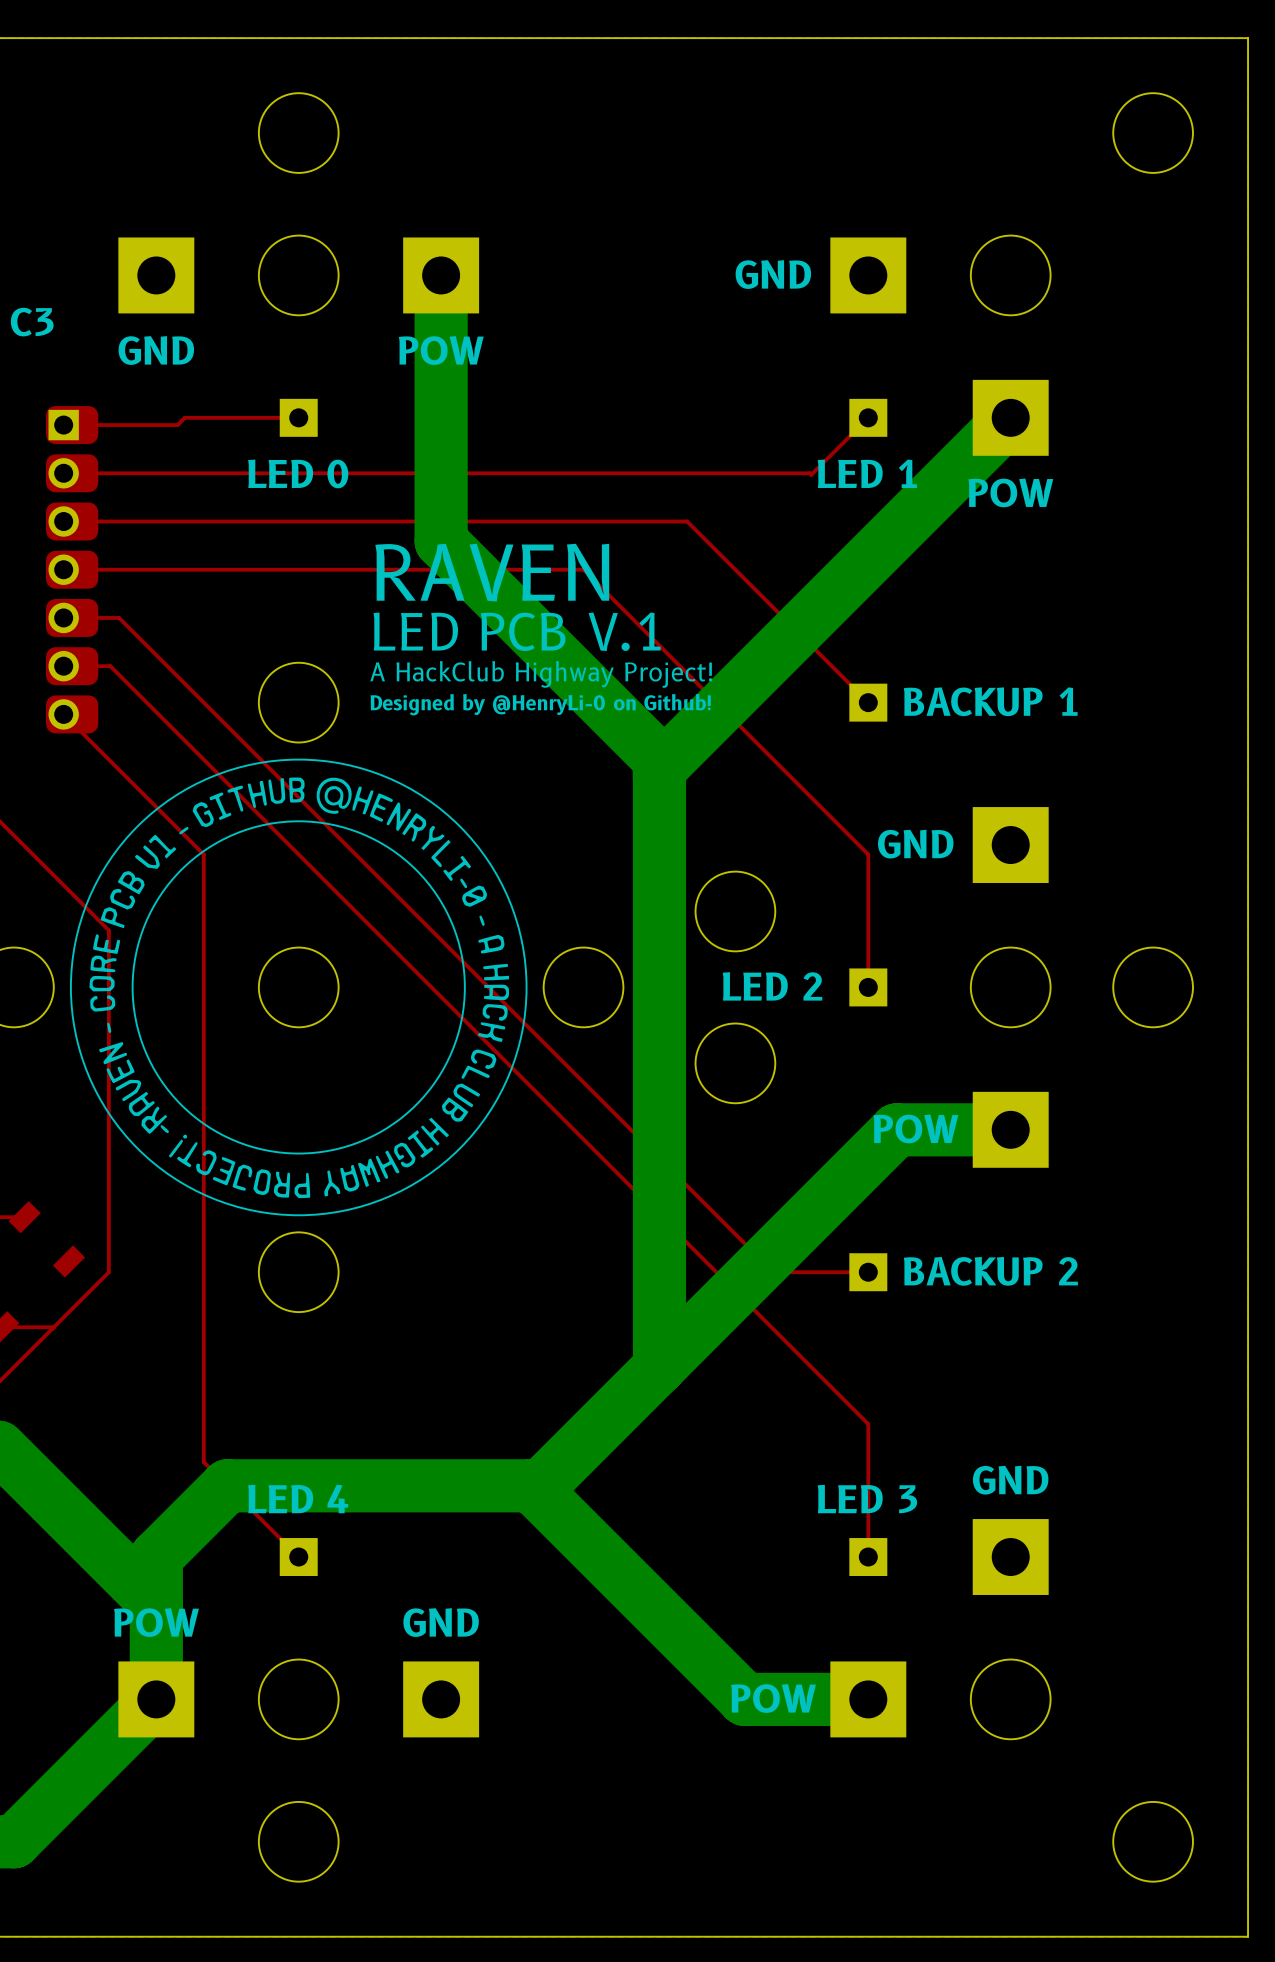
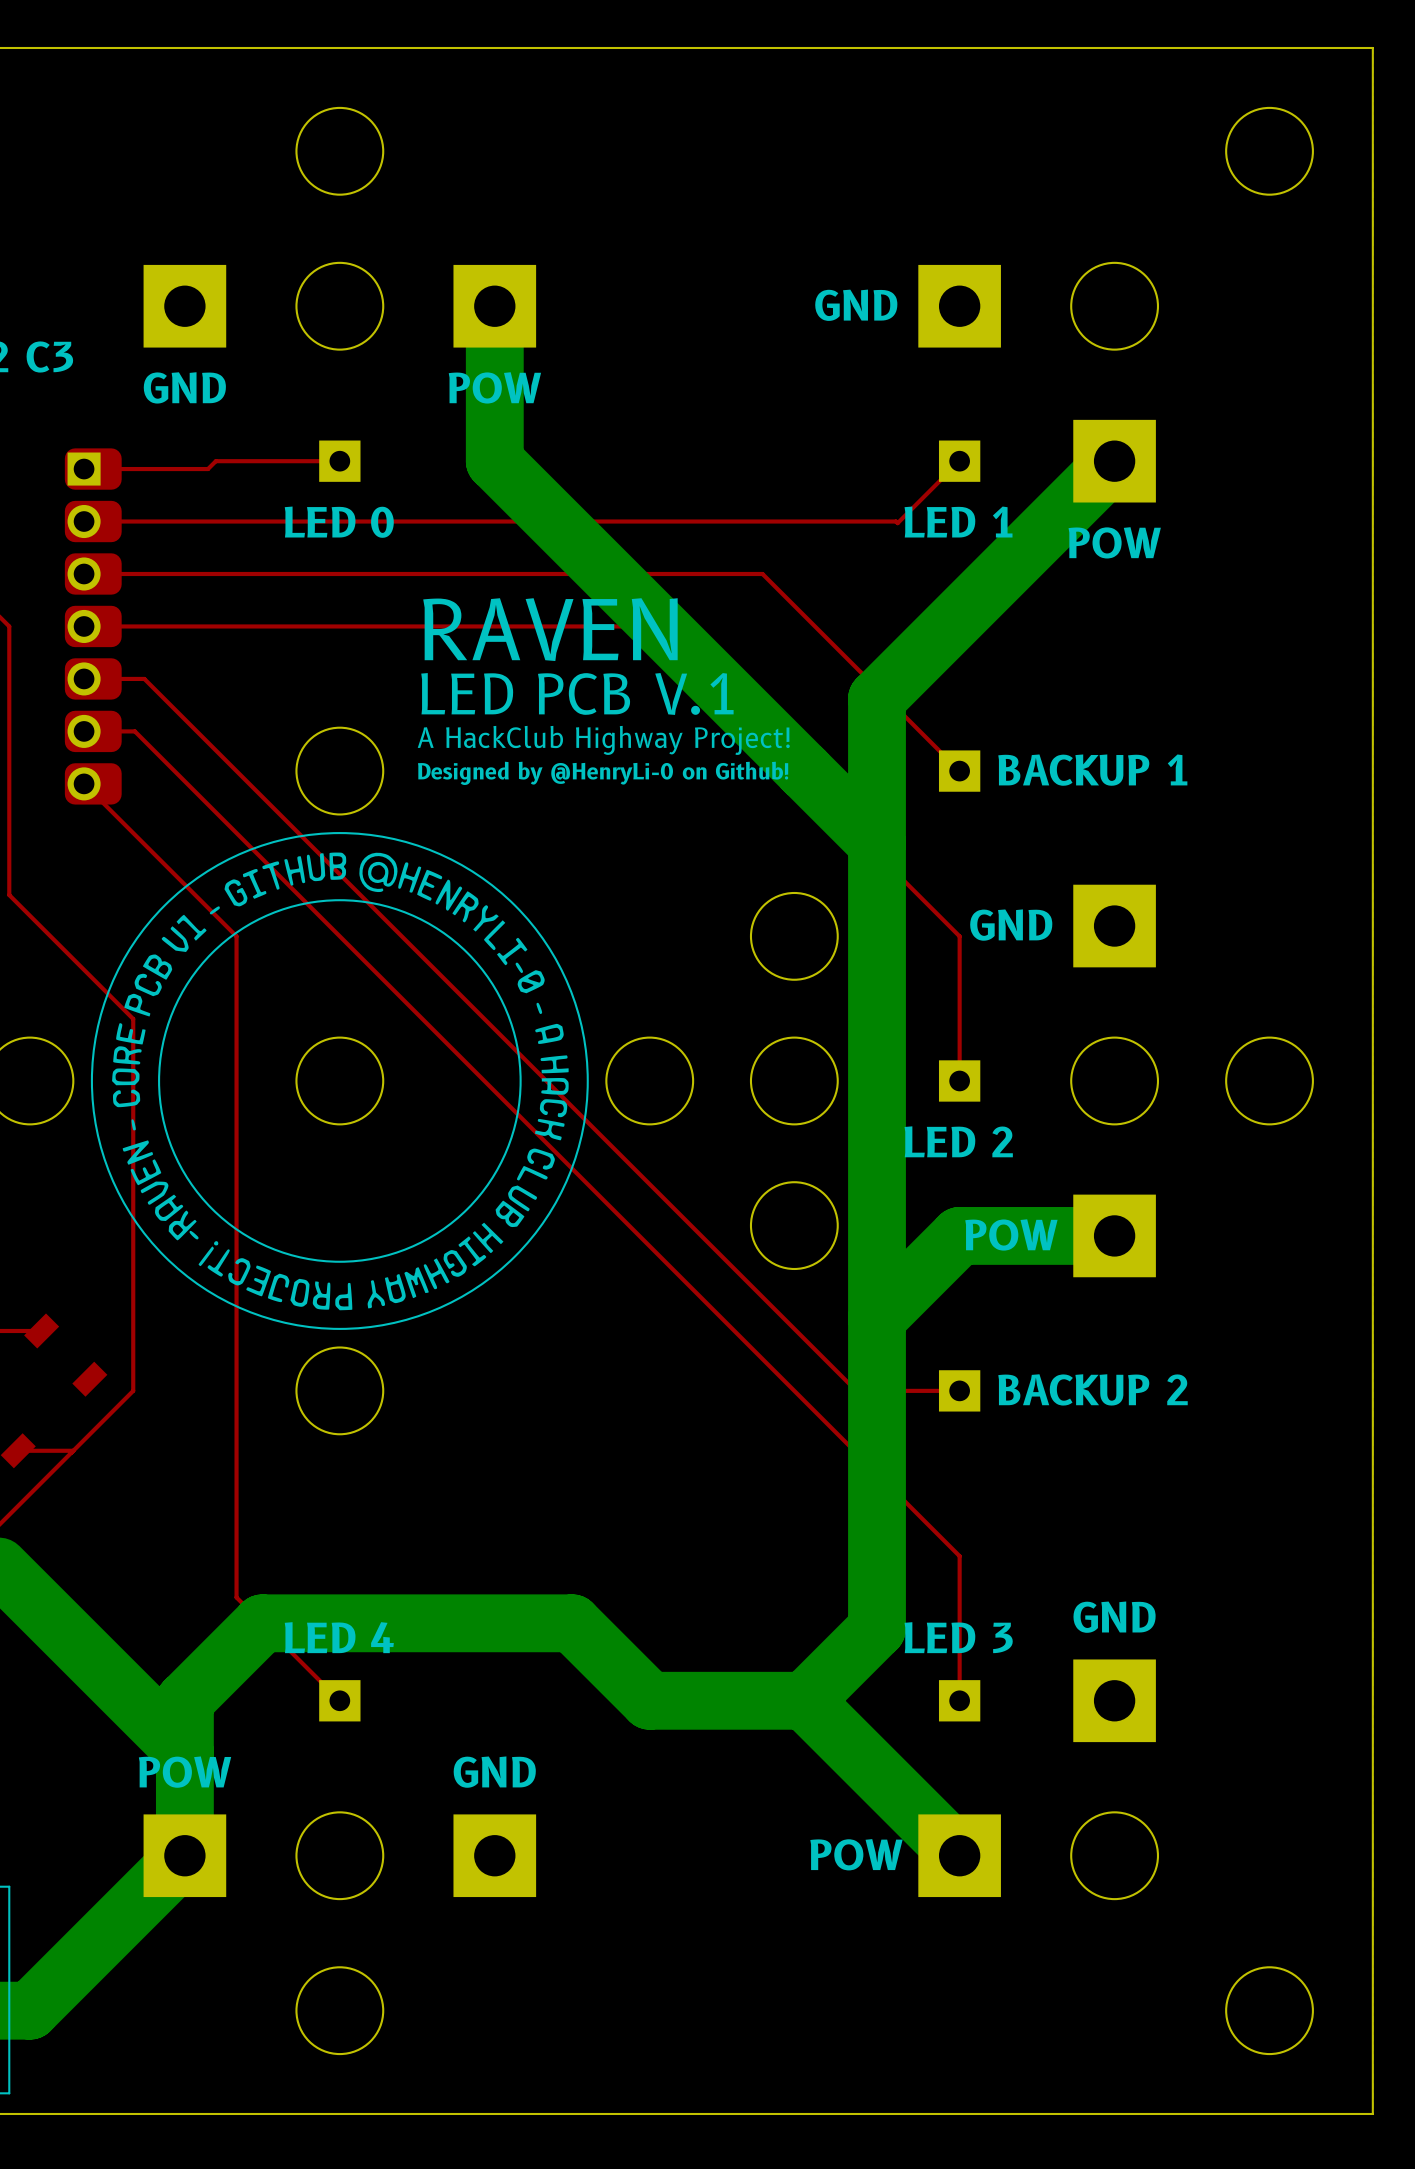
bottom track: (441, 417) (441, 541) (659, 759) (659, 1367) -> (494, 461) (877, 843)
bottom track: (792, 636) (659, 769) -> (877, 698) (877, 1628) (804, 1700)
round board edge: none -> [749, 891, 839, 981]
round board edge: [694, 870, 777, 953] -> none
round board edge: none -> [749, 1036, 839, 1126]
text position: LED 2 (772, 986) -> LED 2 (958, 1141)
round board edge: [694, 1022, 777, 1105] -> none
round board edge: none -> [749, 1181, 839, 1271]
bottom track: (896, 1129) (540, 1485) -> (990, 1235) (959, 1235) (877, 1318)
bottom track: (512, 1485) (531, 1485) (744, 1699) (868, 1699) -> (572, 1623) (649, 1700) (804, 1700)
bottom track: none -> (804, 1700) (959, 1855)

